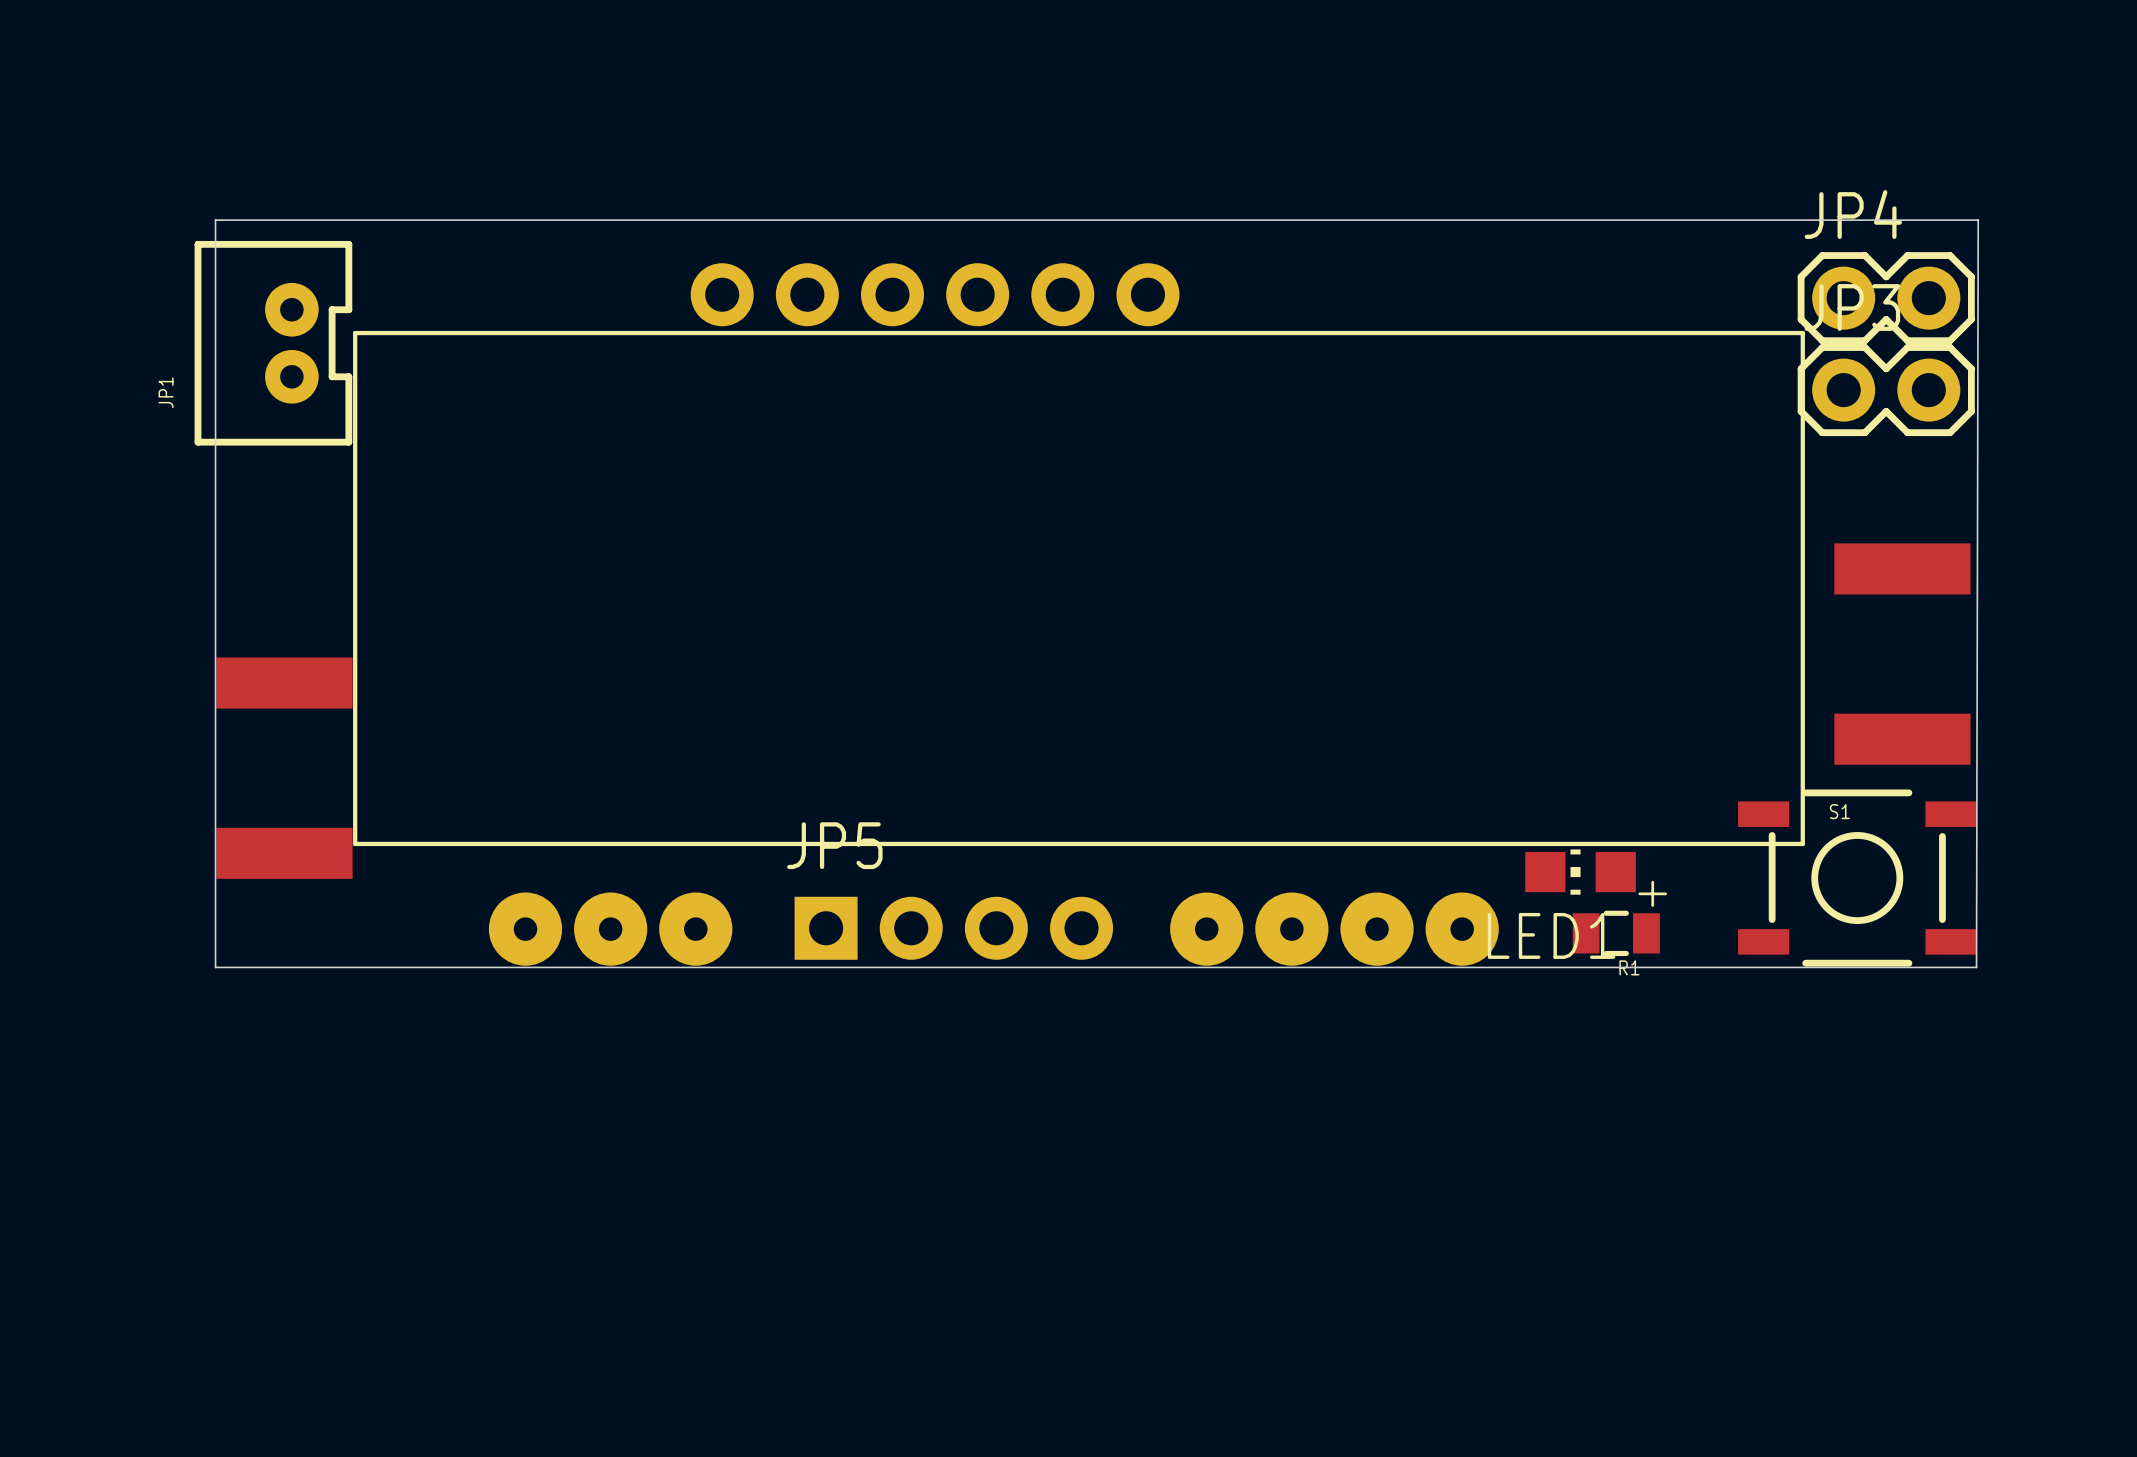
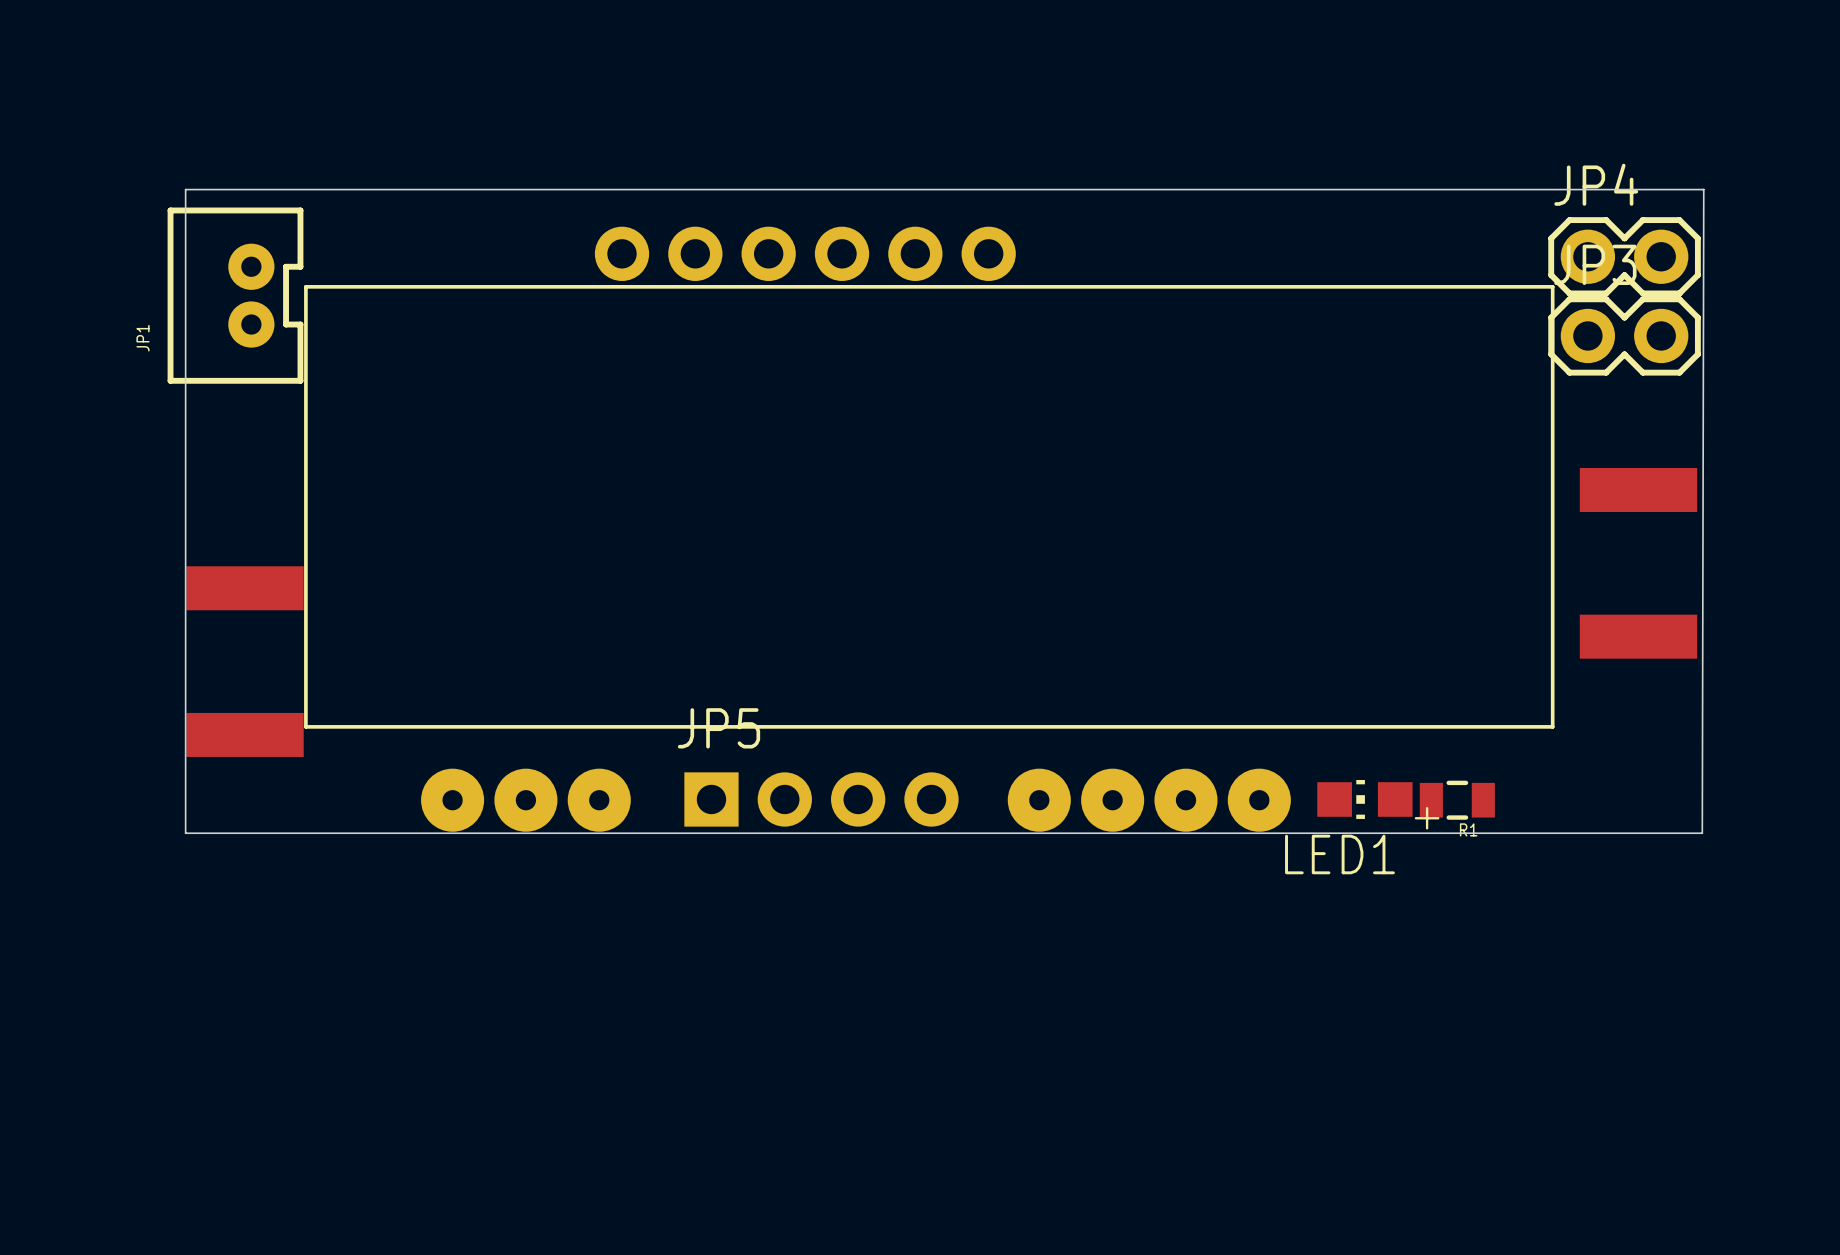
LED1 position: (1580, 872) -> (1364, 799)
S1: (1857, 878) -> none
R1 position: (1616, 933) -> (1457, 800)

